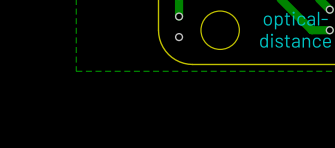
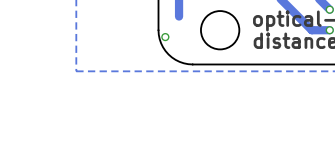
via: (179, 16) -> none
via: none -> (165, 37)
via: (179, 37) -> none

